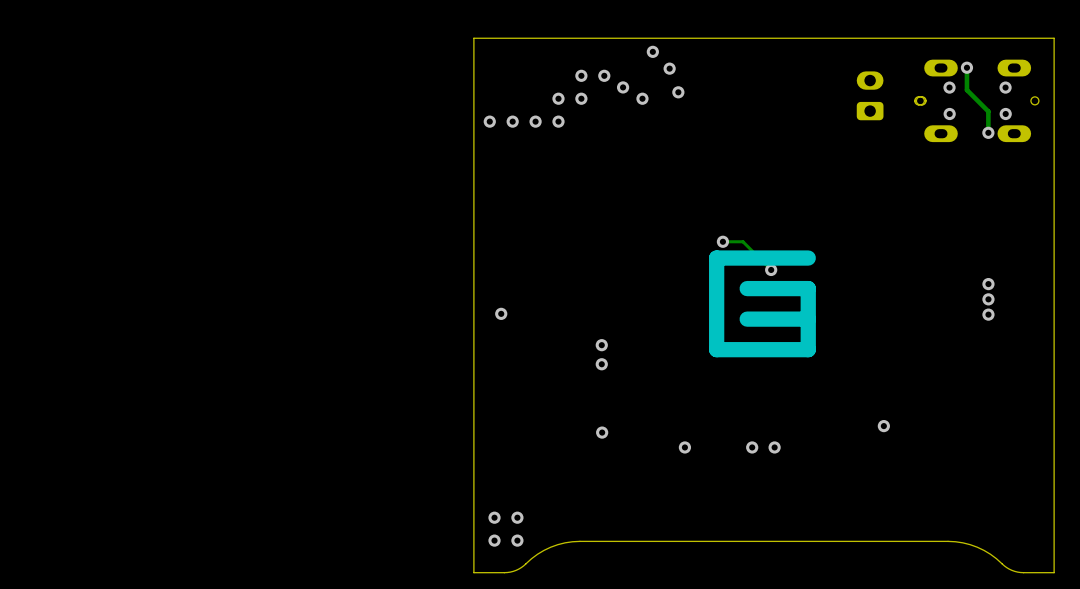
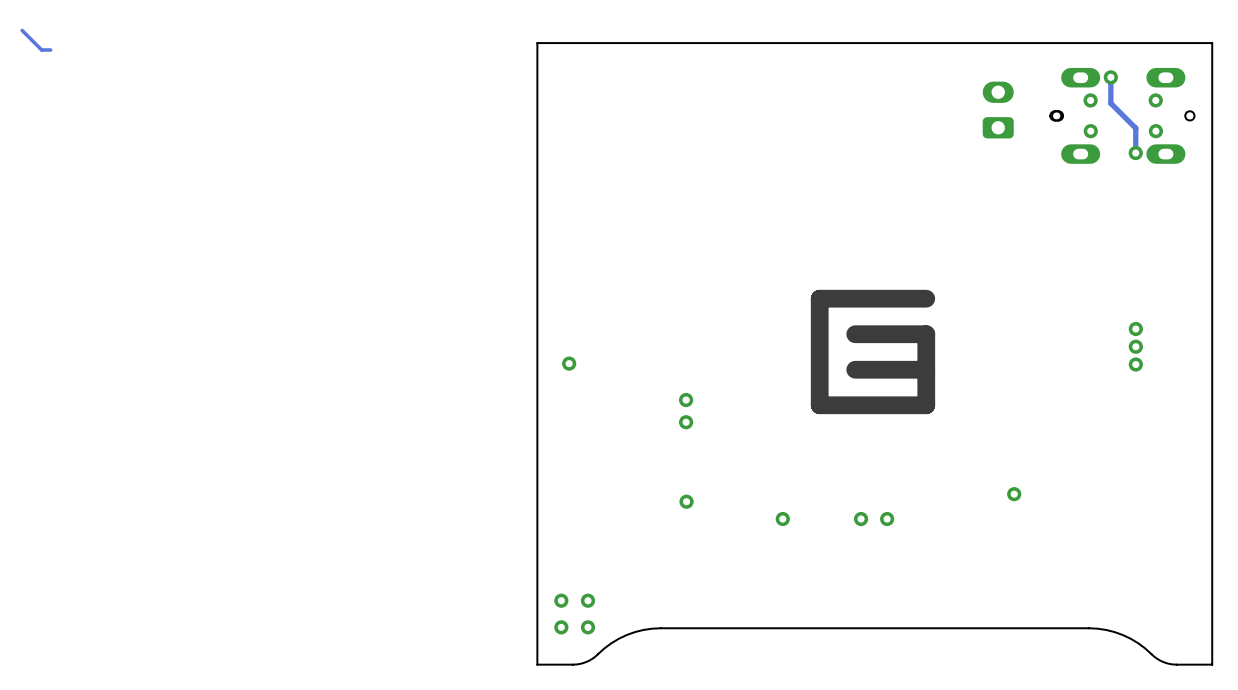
track: none -> (22, 30) (41, 50) (50, 50)
via: (652, 51) -> none
via: (669, 68) -> none
via: (581, 75) -> none
via: (604, 75) -> none
via: (623, 87) -> none
via: (678, 92) -> none
via: (558, 98) -> none
via: (581, 98) -> none
via: (642, 98) -> none
via: (489, 121) -> none
via: (512, 121) -> none
via: (535, 121) -> none
via: (558, 121) -> none
track: (722, 241) (742, 241) (771, 269) -> none
via: (722, 241) -> none
via: (771, 269) -> none

